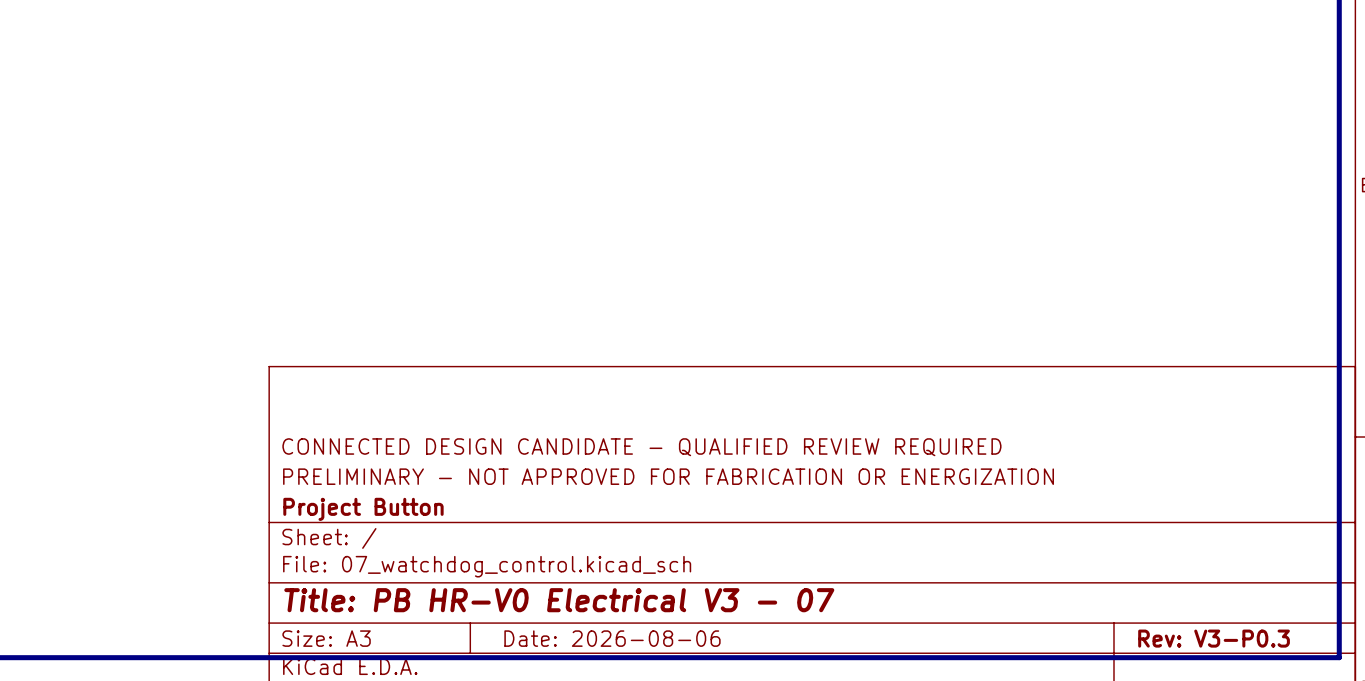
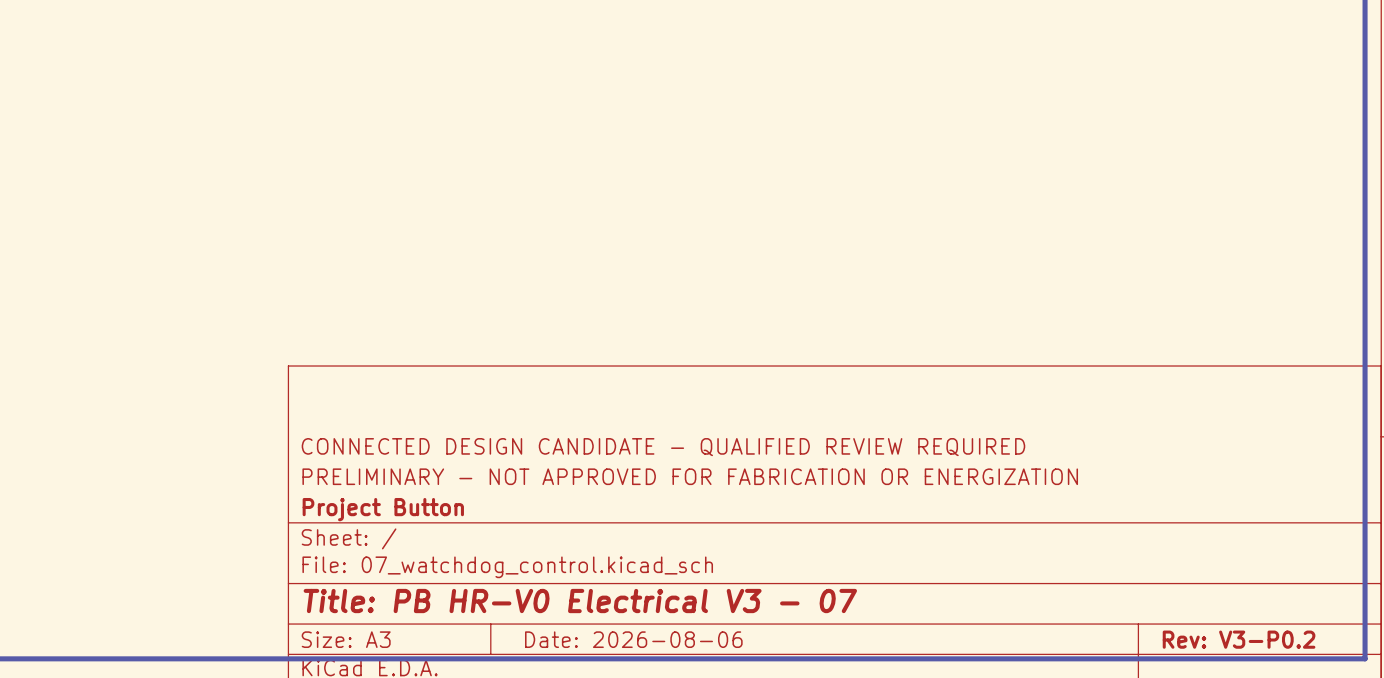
title block: Rev: V3-P0.3 (1214, 638) -> Rev: V3-P0.2 (1239, 639)

